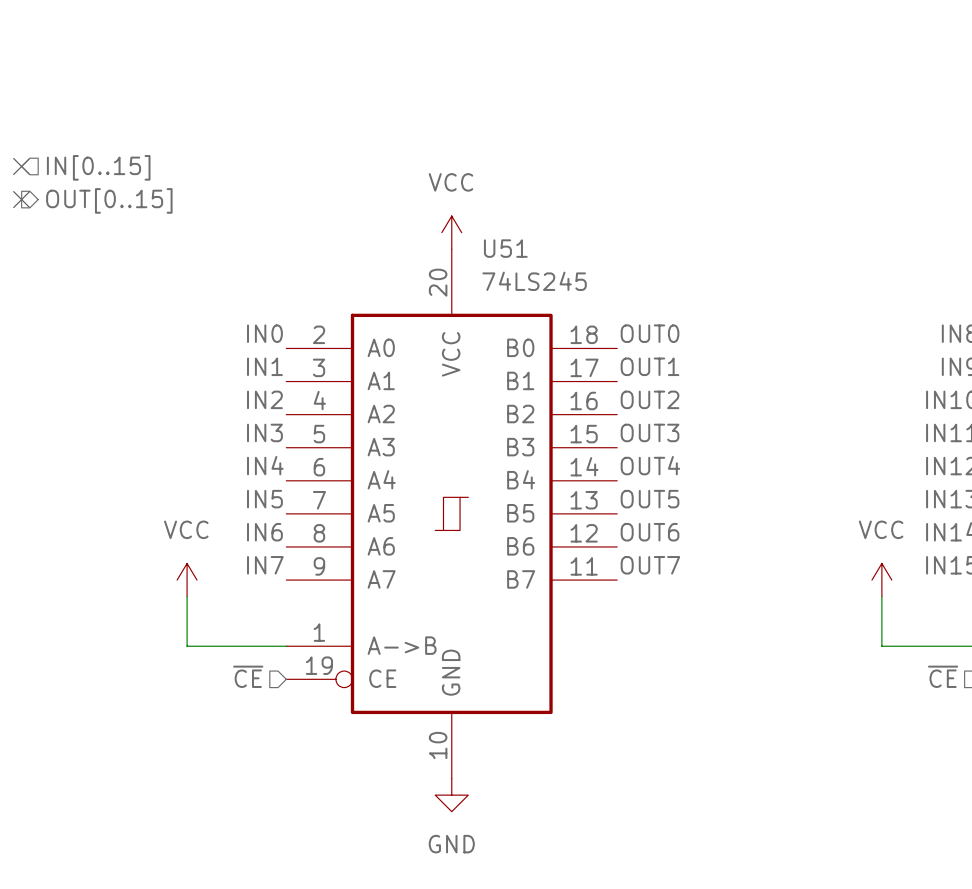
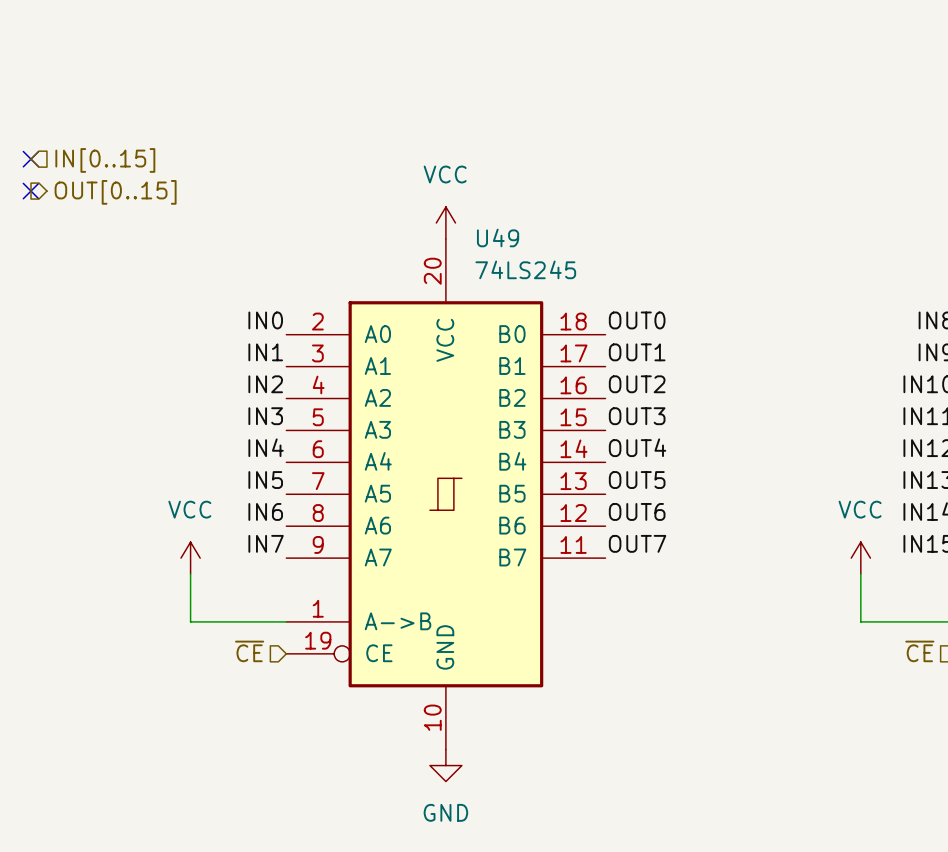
U51 name: U51 (505, 248) -> U49 (498, 237)

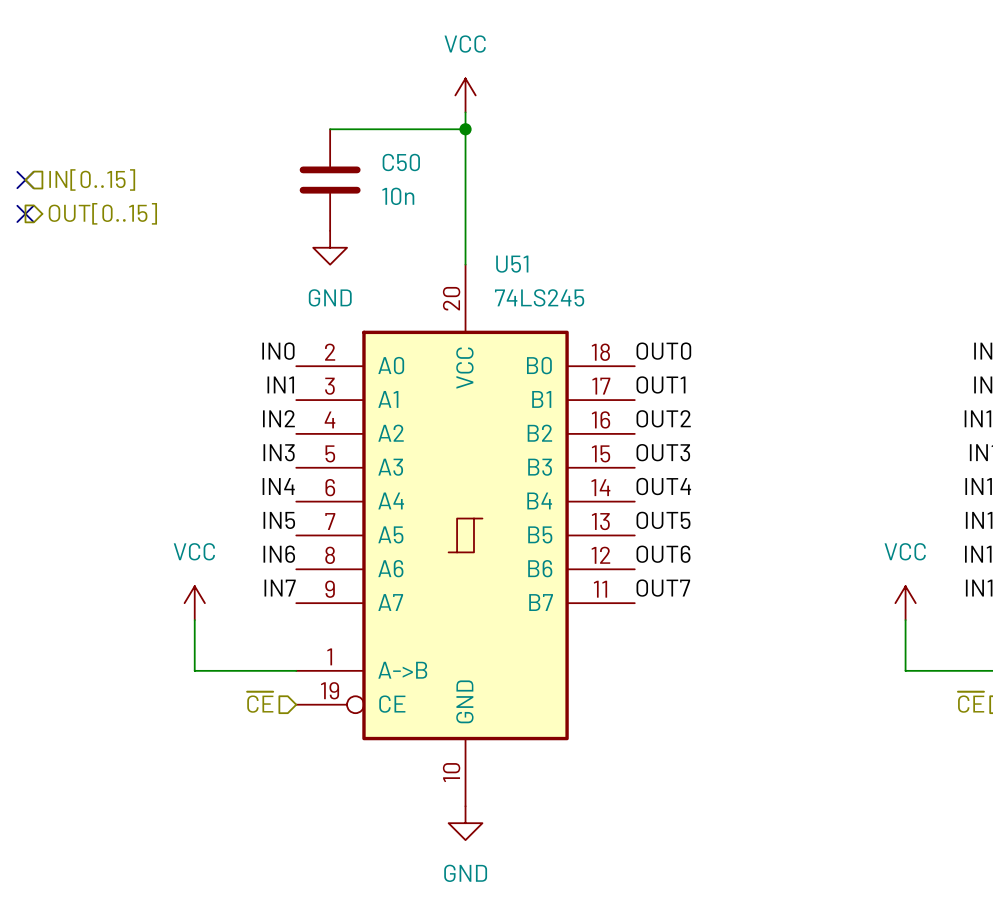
wire: none -> (465, 112) (465, 264)
wire: none -> (330, 129) (465, 129)
junction: none -> (465, 129)
C50: none -> 10n (330, 180)
power symbol: none -> GND (330, 247)
power symbol position: VCC (445, 222) -> VCC (465, 95)
U49 name: U49 (498, 237) -> U51 (512, 264)

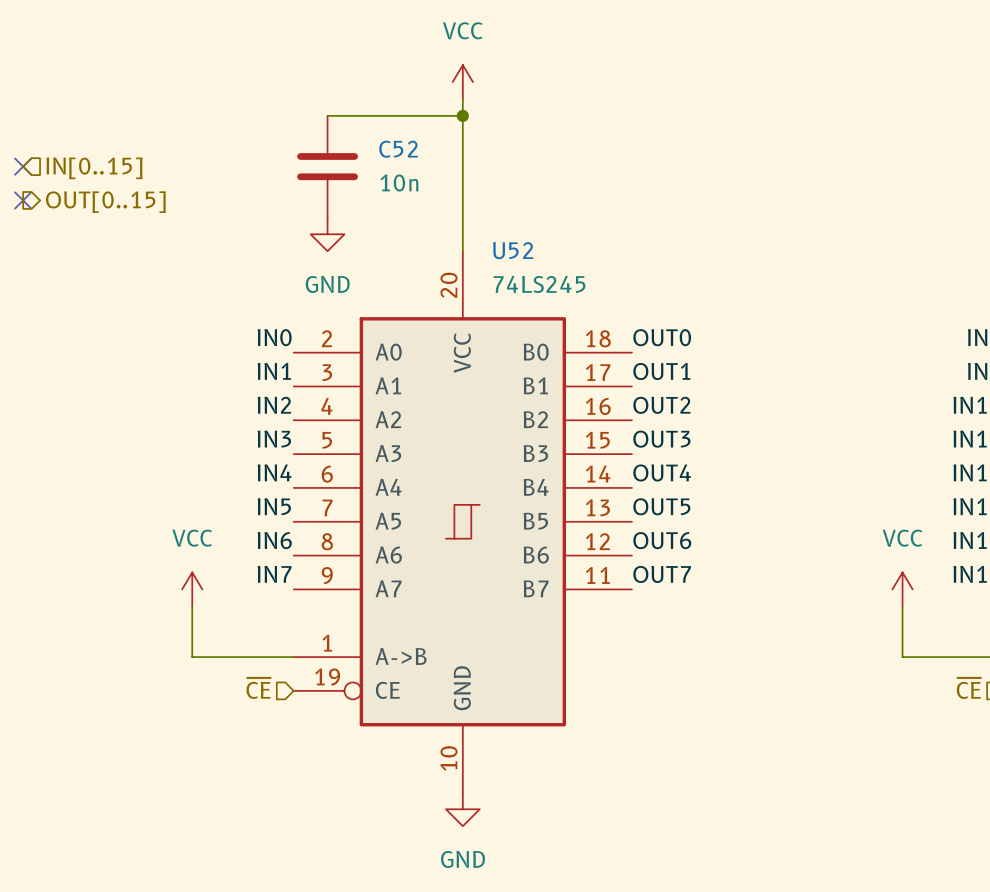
C50 name: C50 (401, 162) -> C52 (398, 149)
U51 name: U51 (512, 264) -> U52 (513, 250)

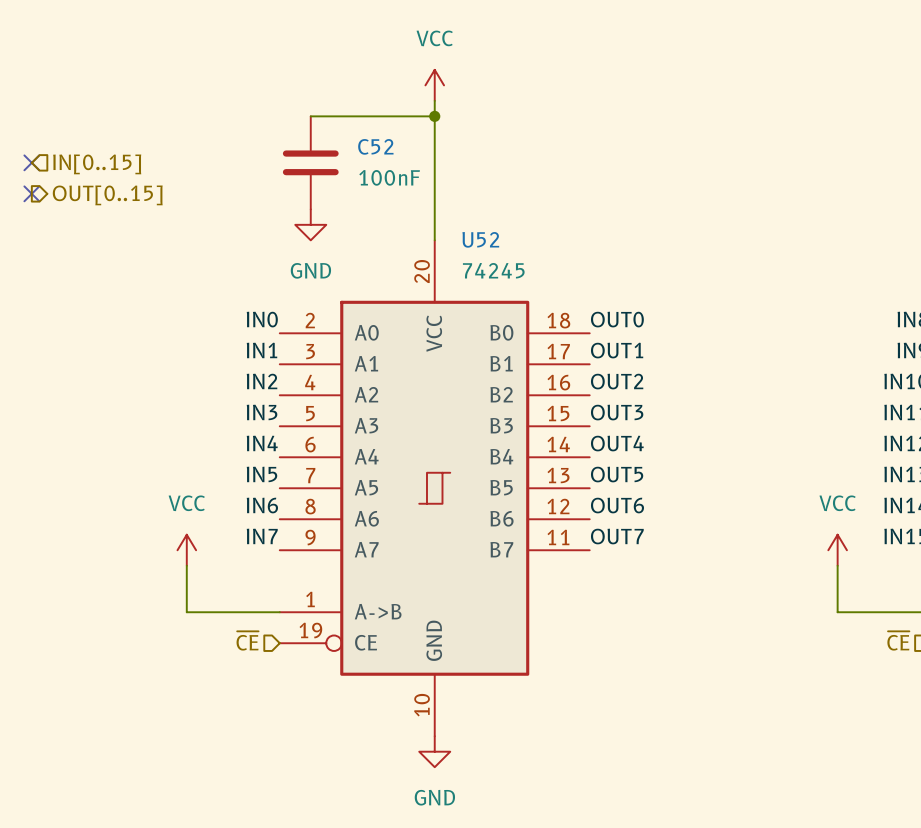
C52 value: 10n (399, 183) -> 100nF (389, 177)
U52 value: 74LS245 (539, 284) -> 74245 (493, 270)

